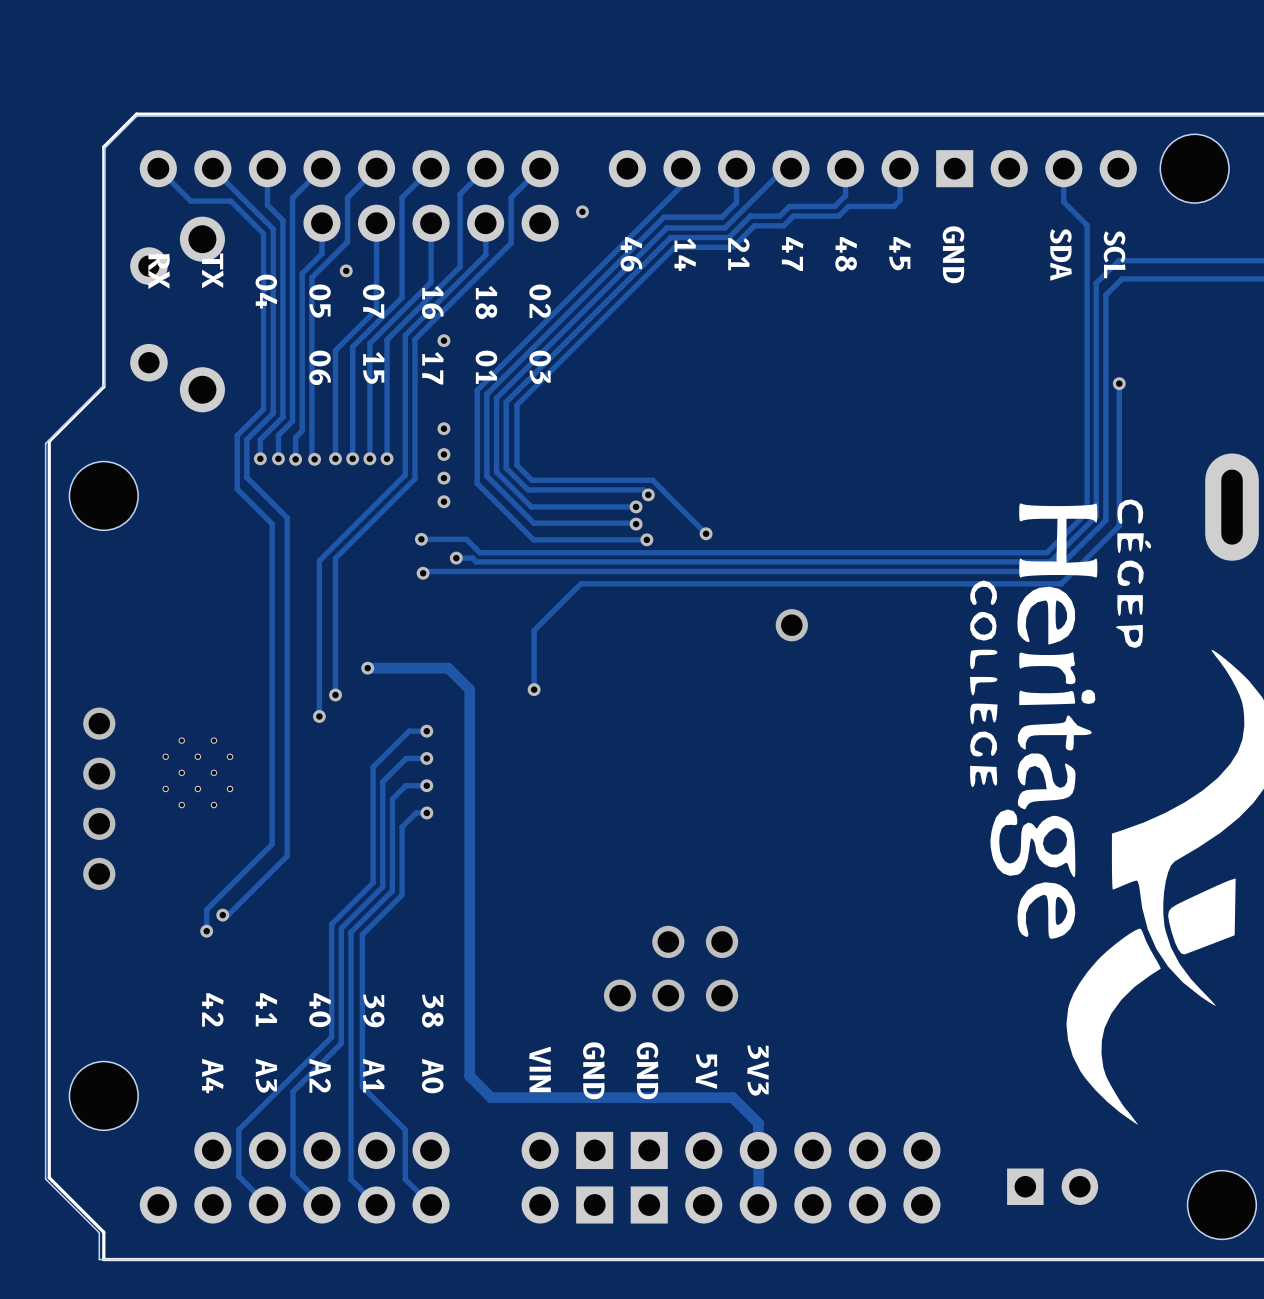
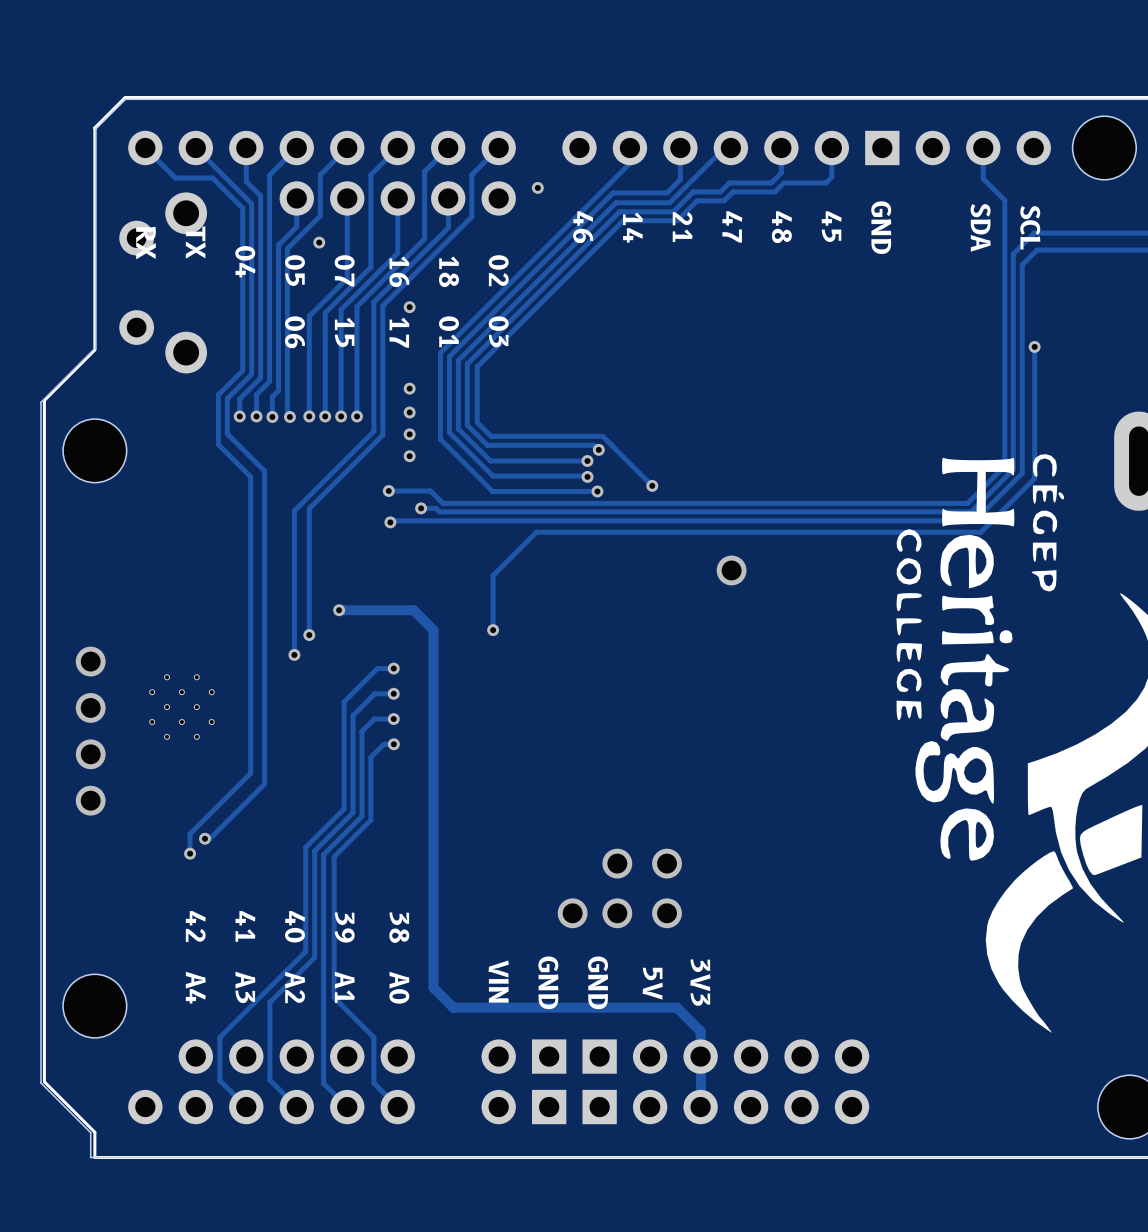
part: (1052, 1186) -> none

